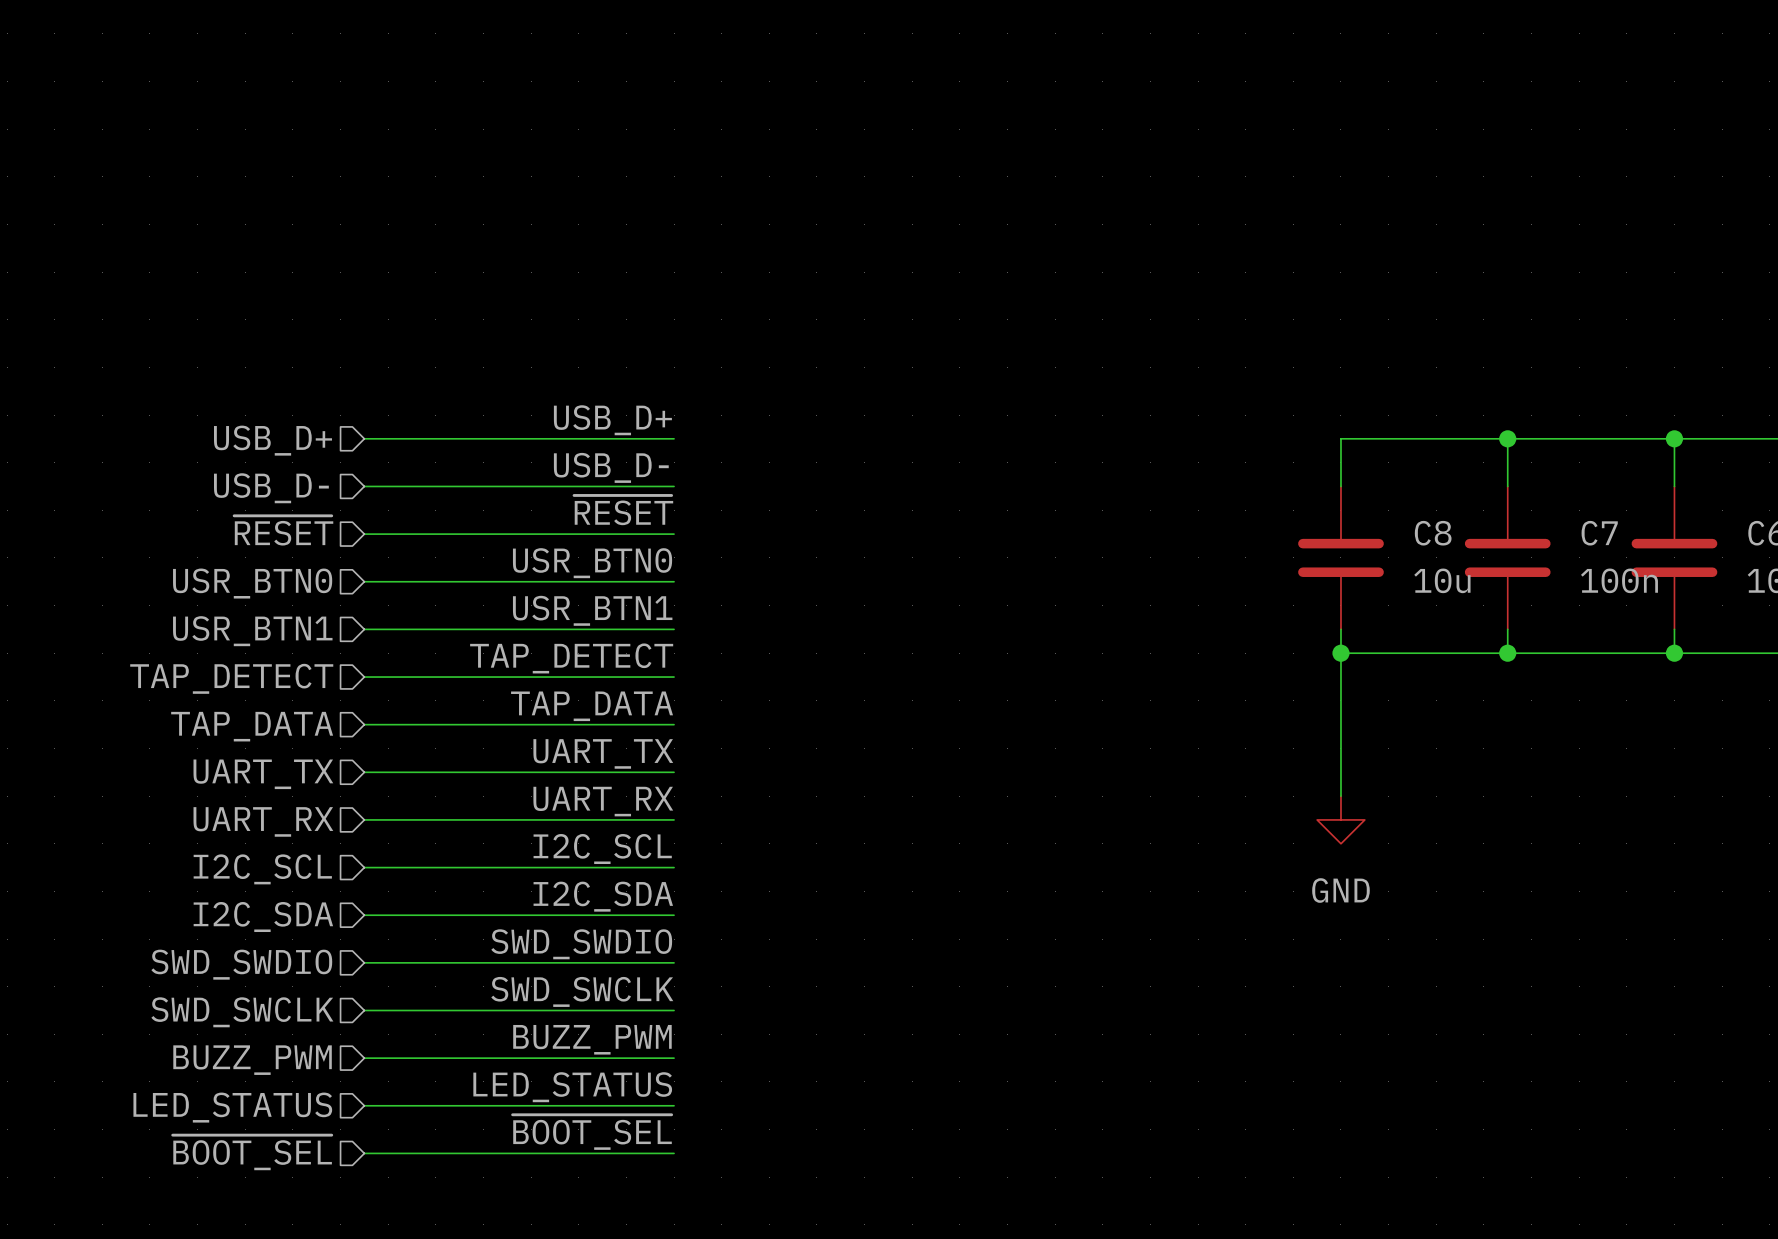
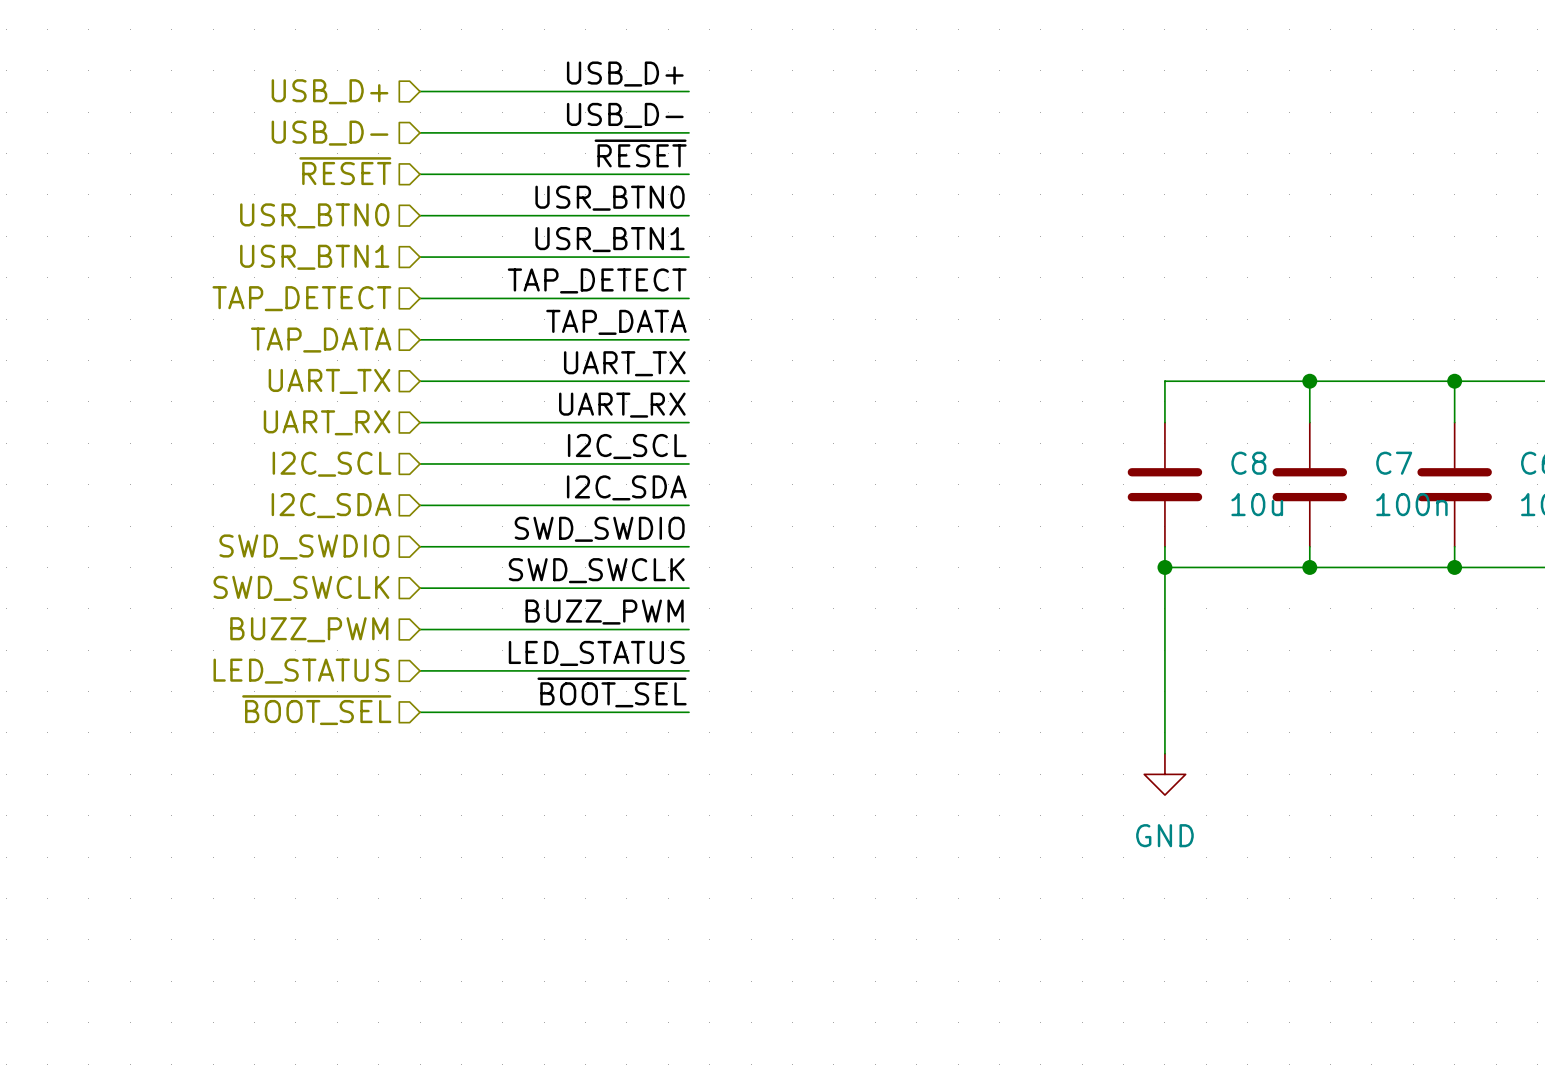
wire: none -> (420, 91) (689, 91)
wire: none -> (420, 132) (689, 132)
wire: none -> (420, 174) (689, 174)
wire: none -> (420, 215) (689, 215)
wire: none -> (420, 257) (689, 257)
wire: none -> (420, 298) (689, 298)
wire: none -> (420, 339) (689, 339)
label position: USB_D+ (612, 420) -> USB_D+ (625, 74)
wire: (364, 438) (483, 438) -> (585, 381) (689, 381)
hierarchical label position: USB_D+ (273, 440) -> USB_D+ (330, 91)
label position: USB_D- (611, 467) -> USB_D- (625, 115)
wire: (364, 486) (483, 486) -> (585, 422) (689, 422)
hierarchical label position: USB_D- (271, 488) -> USB_D- (330, 133)
label position: ~{RESET} (623, 510) -> ~{RESET} (640, 153)
hierarchical label position: ~{RESET} (283, 530) -> ~{RESET} (345, 171)
wire: (364, 534) (483, 534) -> (585, 463) (689, 463)
label position: USR_BTN0 (592, 563) -> USR_BTN0 (610, 198)
wire: (364, 581) (483, 581) -> (585, 505) (689, 505)
hierarchical label position: USR_BTN0 (252, 583) -> USR_BTN0 (314, 215)
label position: USR_BTN1 (592, 610) -> USR_BTN1 (610, 239)
wire: (364, 629) (483, 629) -> (585, 546) (689, 546)
hierarchical label position: USR_BTN1 (252, 631) -> USR_BTN1 (314, 257)
label position: TAP_DETECT (571, 658) -> TAP_DETECT (597, 280)
wire: (364, 677) (483, 677) -> (585, 588) (689, 588)
hierarchical label position: TAP_DETECT (231, 678) -> TAP_DETECT (301, 298)
label position: TAP_DATA (592, 706) -> TAP_DATA (616, 322)
wire: (364, 724) (483, 724) -> (585, 629) (689, 629)
hierarchical label position: TAP_DATA (252, 726) -> TAP_DATA (321, 340)
label position: UART_TX (603, 753) -> UART_TX (624, 363)
wire: (364, 772) (483, 772) -> (585, 670) (689, 670)
hierarchical label position: UART_TX (263, 774) -> UART_TX (329, 381)
wire: none -> (1164, 691) (1164, 753)
label position: UART_RX (603, 801) -> UART_RX (622, 405)
wire: (364, 819) (483, 819) -> (585, 712) (689, 712)
power symbol position: GND (1340, 819) -> GND (1164, 774)
hierarchical label position: UART_RX (263, 821) -> UART_RX (327, 422)
label position: I2C_SCL (602, 849) -> I2C_SCL (627, 446)
wire: (364, 867) (674, 867) -> none
hierarchical label position: I2C_SCL (262, 869) -> I2C_SCL (331, 464)
label position: I2C_SDA (603, 896) -> I2C_SDA (626, 487)
wire: (364, 915) (674, 915) -> none
hierarchical label position: I2C_SDA (263, 917) -> I2C_SDA (331, 505)
label position: SWD_SWDIO (581, 944) -> SWD_SWDIO (599, 529)
wire: (364, 962) (674, 962) -> none
hierarchical label position: SWD_SWDIO (241, 964) -> SWD_SWDIO (304, 546)
label position: SWD_SWCLK (582, 991) -> SWD_SWCLK (596, 570)
wire: (364, 1010) (674, 1010) -> none
hierarchical label position: SWD_SWCLK (242, 1012) -> SWD_SWCLK (301, 588)
label position: BUZZ_PWM (592, 1039) -> BUZZ_PWM (604, 612)
wire: (364, 1058) (674, 1058) -> none
hierarchical label position: BUZZ_PWM (252, 1060) -> BUZZ_PWM (309, 629)
label position: LED_STATUS (572, 1087) -> LED_STATUS (596, 653)
wire: (364, 1105) (674, 1105) -> none
hierarchical label position: LED_STATUS (232, 1107) -> LED_STATUS (301, 671)
label position: ~{BOOT_SEL} (592, 1132) -> ~{BOOT_SEL} (612, 692)
hierarchical label position: ~{BOOT_SEL} (252, 1152) -> ~{BOOT_SEL} (316, 710)
wire: (364, 1153) (674, 1153) -> none

